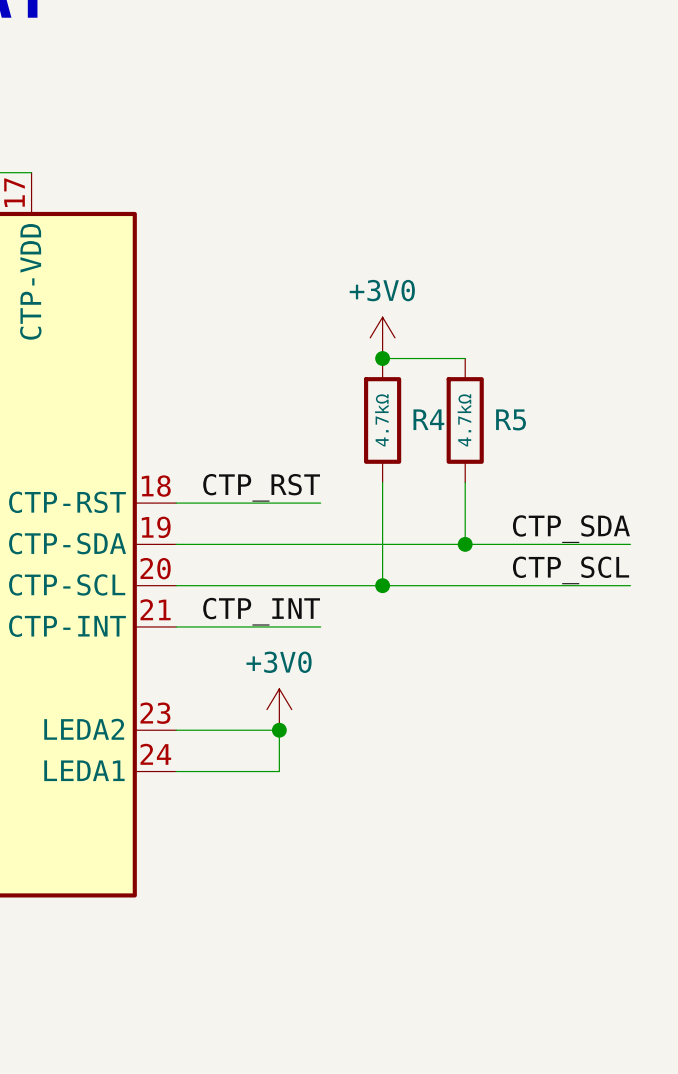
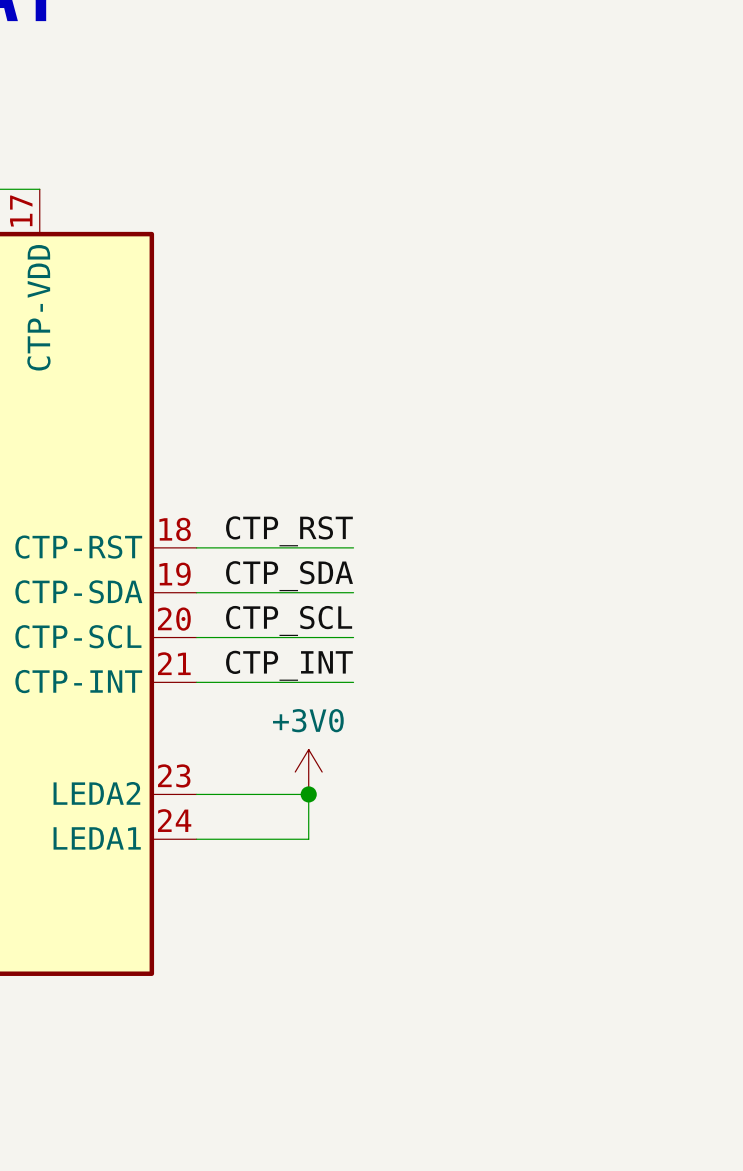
power symbol: +3V0 (382, 337) -> none
wire: (382, 358) (465, 358) -> none
junction: (382, 358) -> none
R4: 4.7kΩ (382, 420) -> none
R5: 4.7kΩ (465, 420) -> none
wire: (382, 482) (382, 585) -> none
wire: (465, 482) (465, 544) -> none
label position: CTP_SDA (571, 529) -> CTP_SDA (289, 576)
wire: (320, 544) (630, 544) -> none
junction: (465, 544) -> none
label position: CTP_SCL (571, 570) -> CTP_SCL (289, 620)
wire: (320, 585) (630, 585) -> none
junction: (382, 585) -> none

